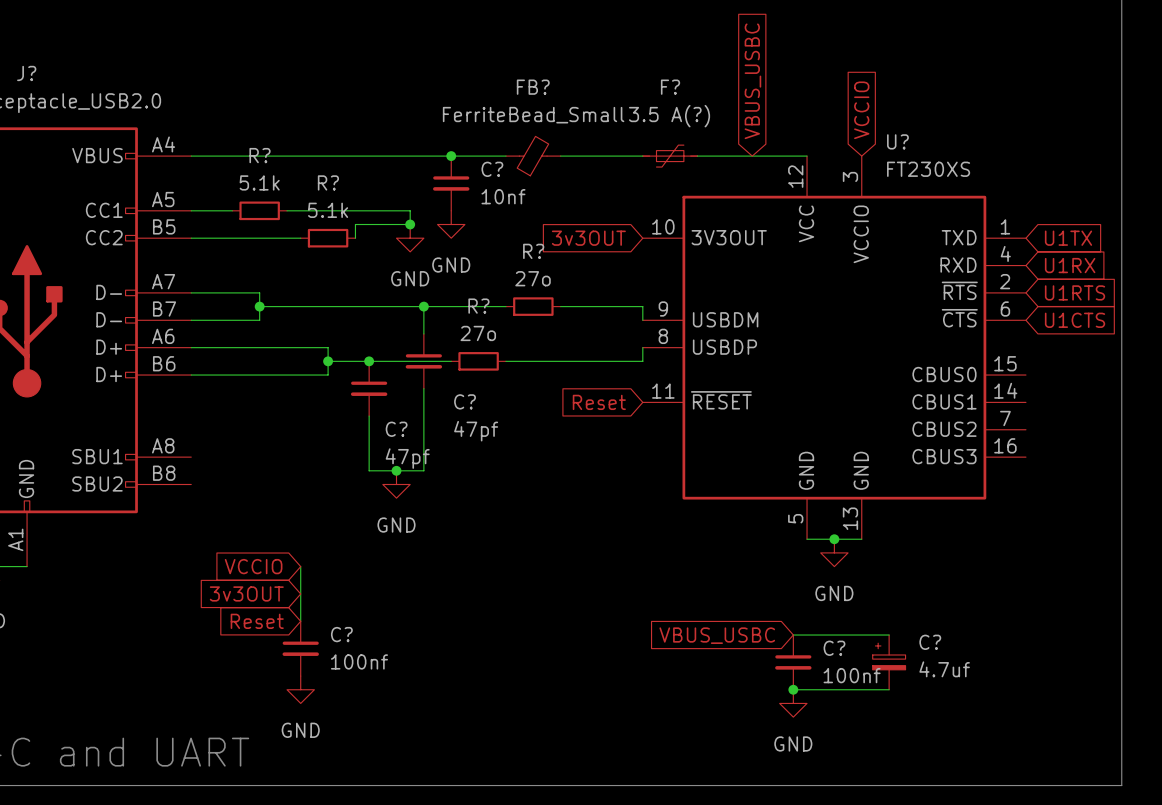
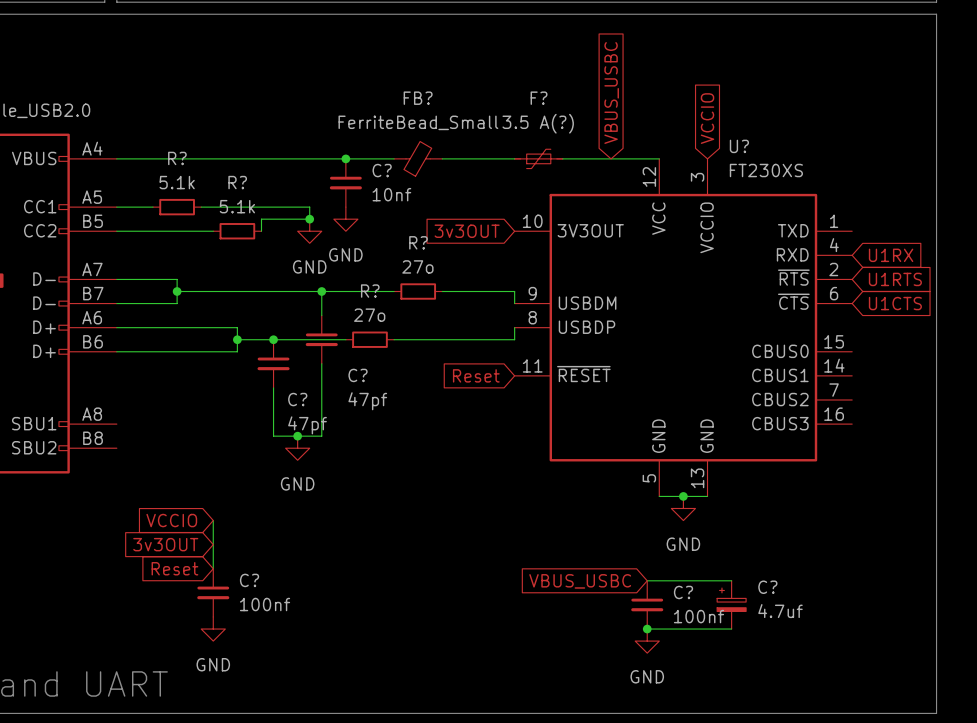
global label: U1TX (1068, 238) -> none

